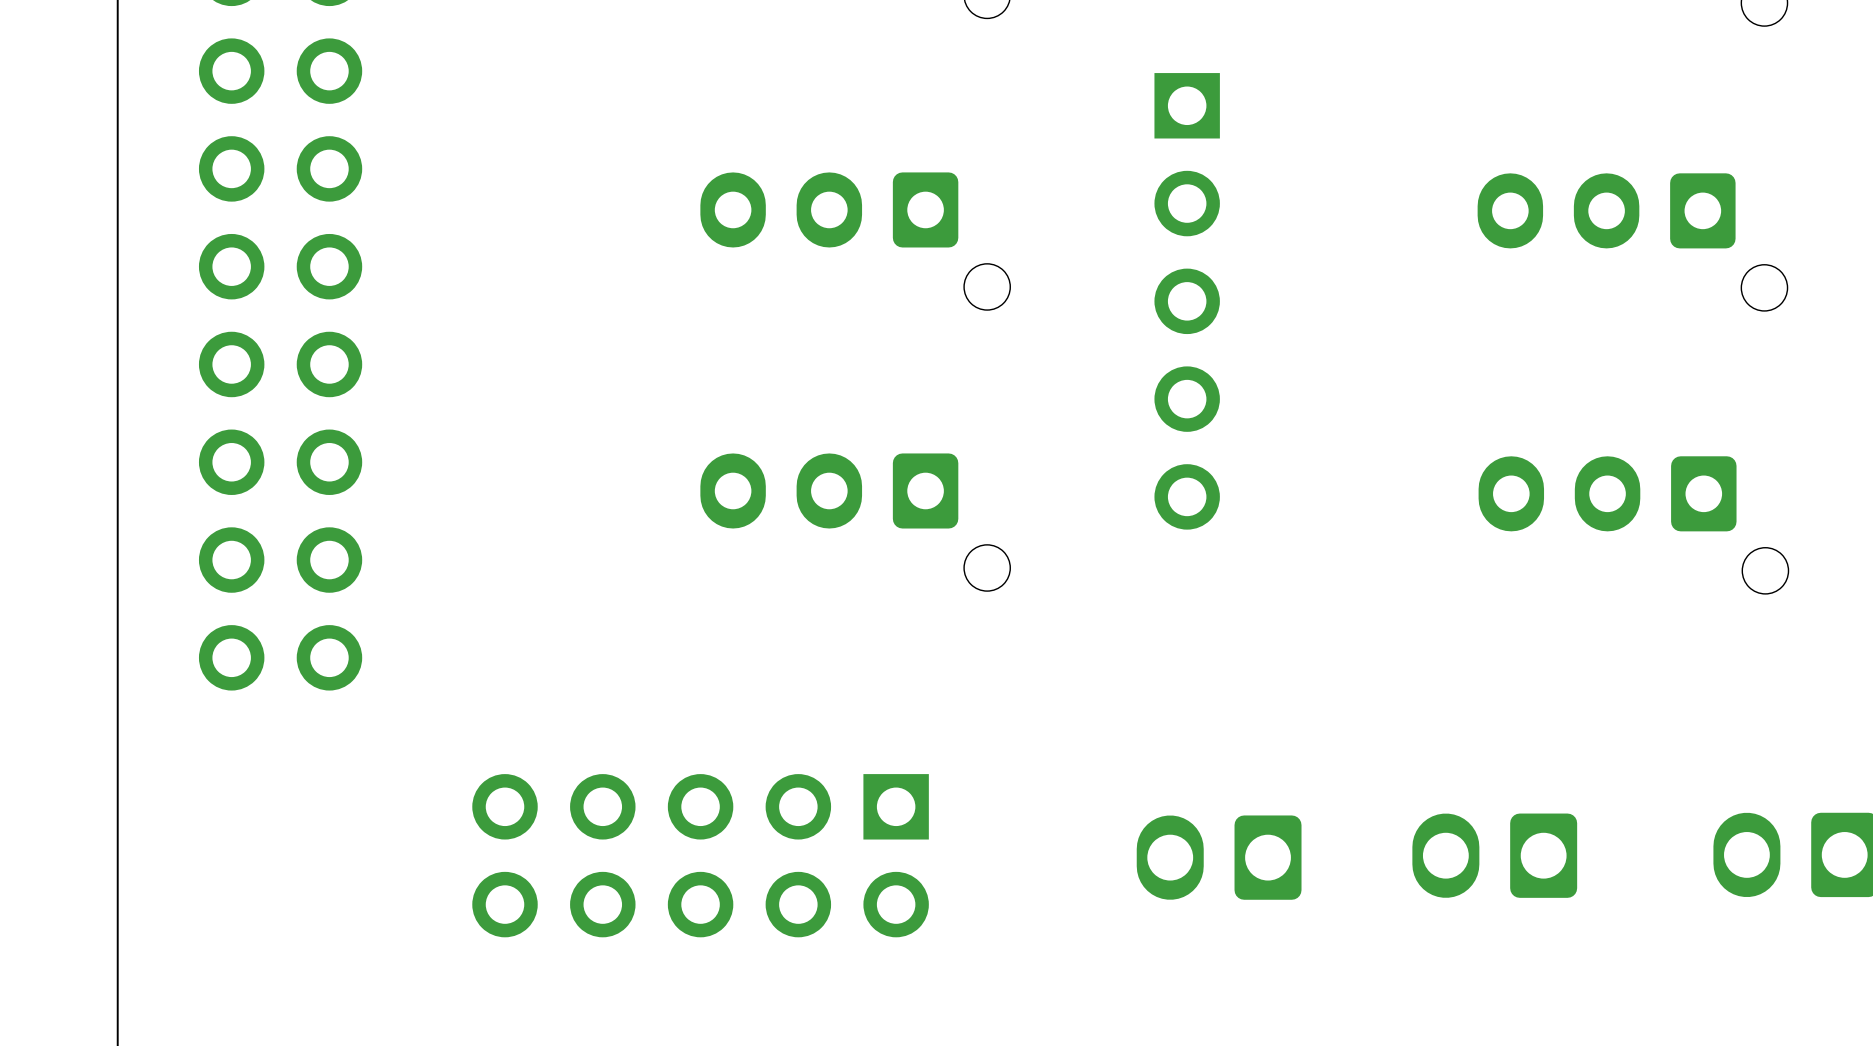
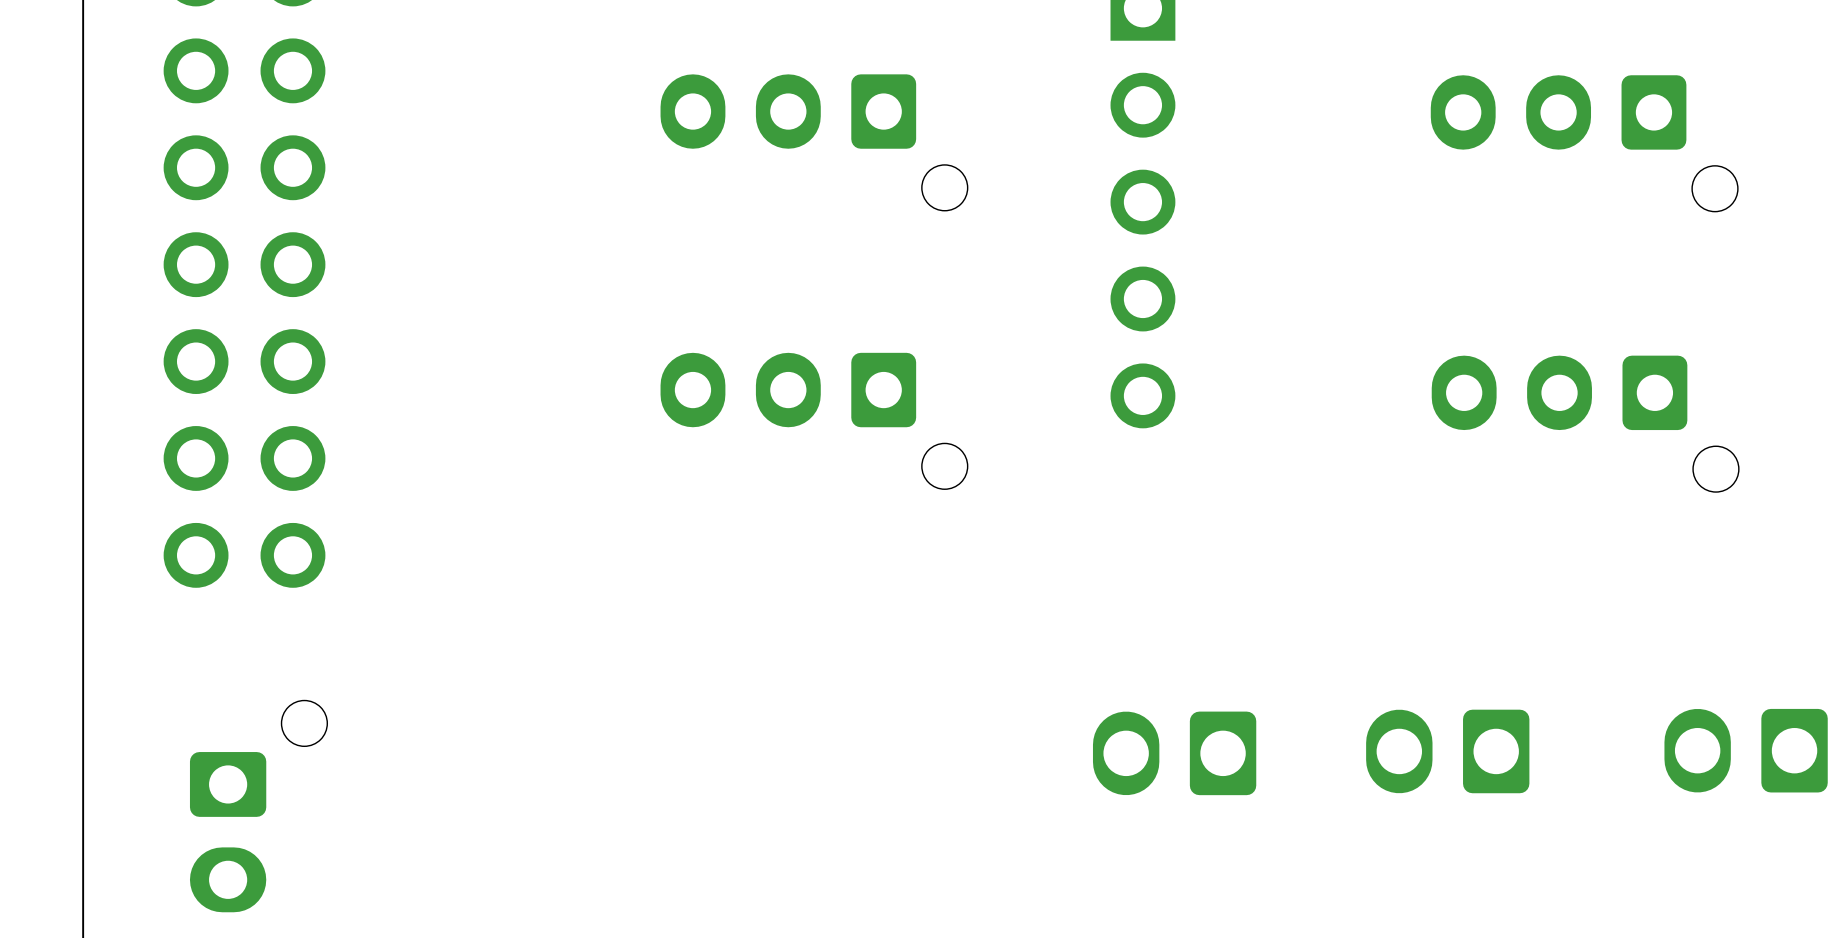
part: (700, 855) -> none
part: none -> (258, 806)

